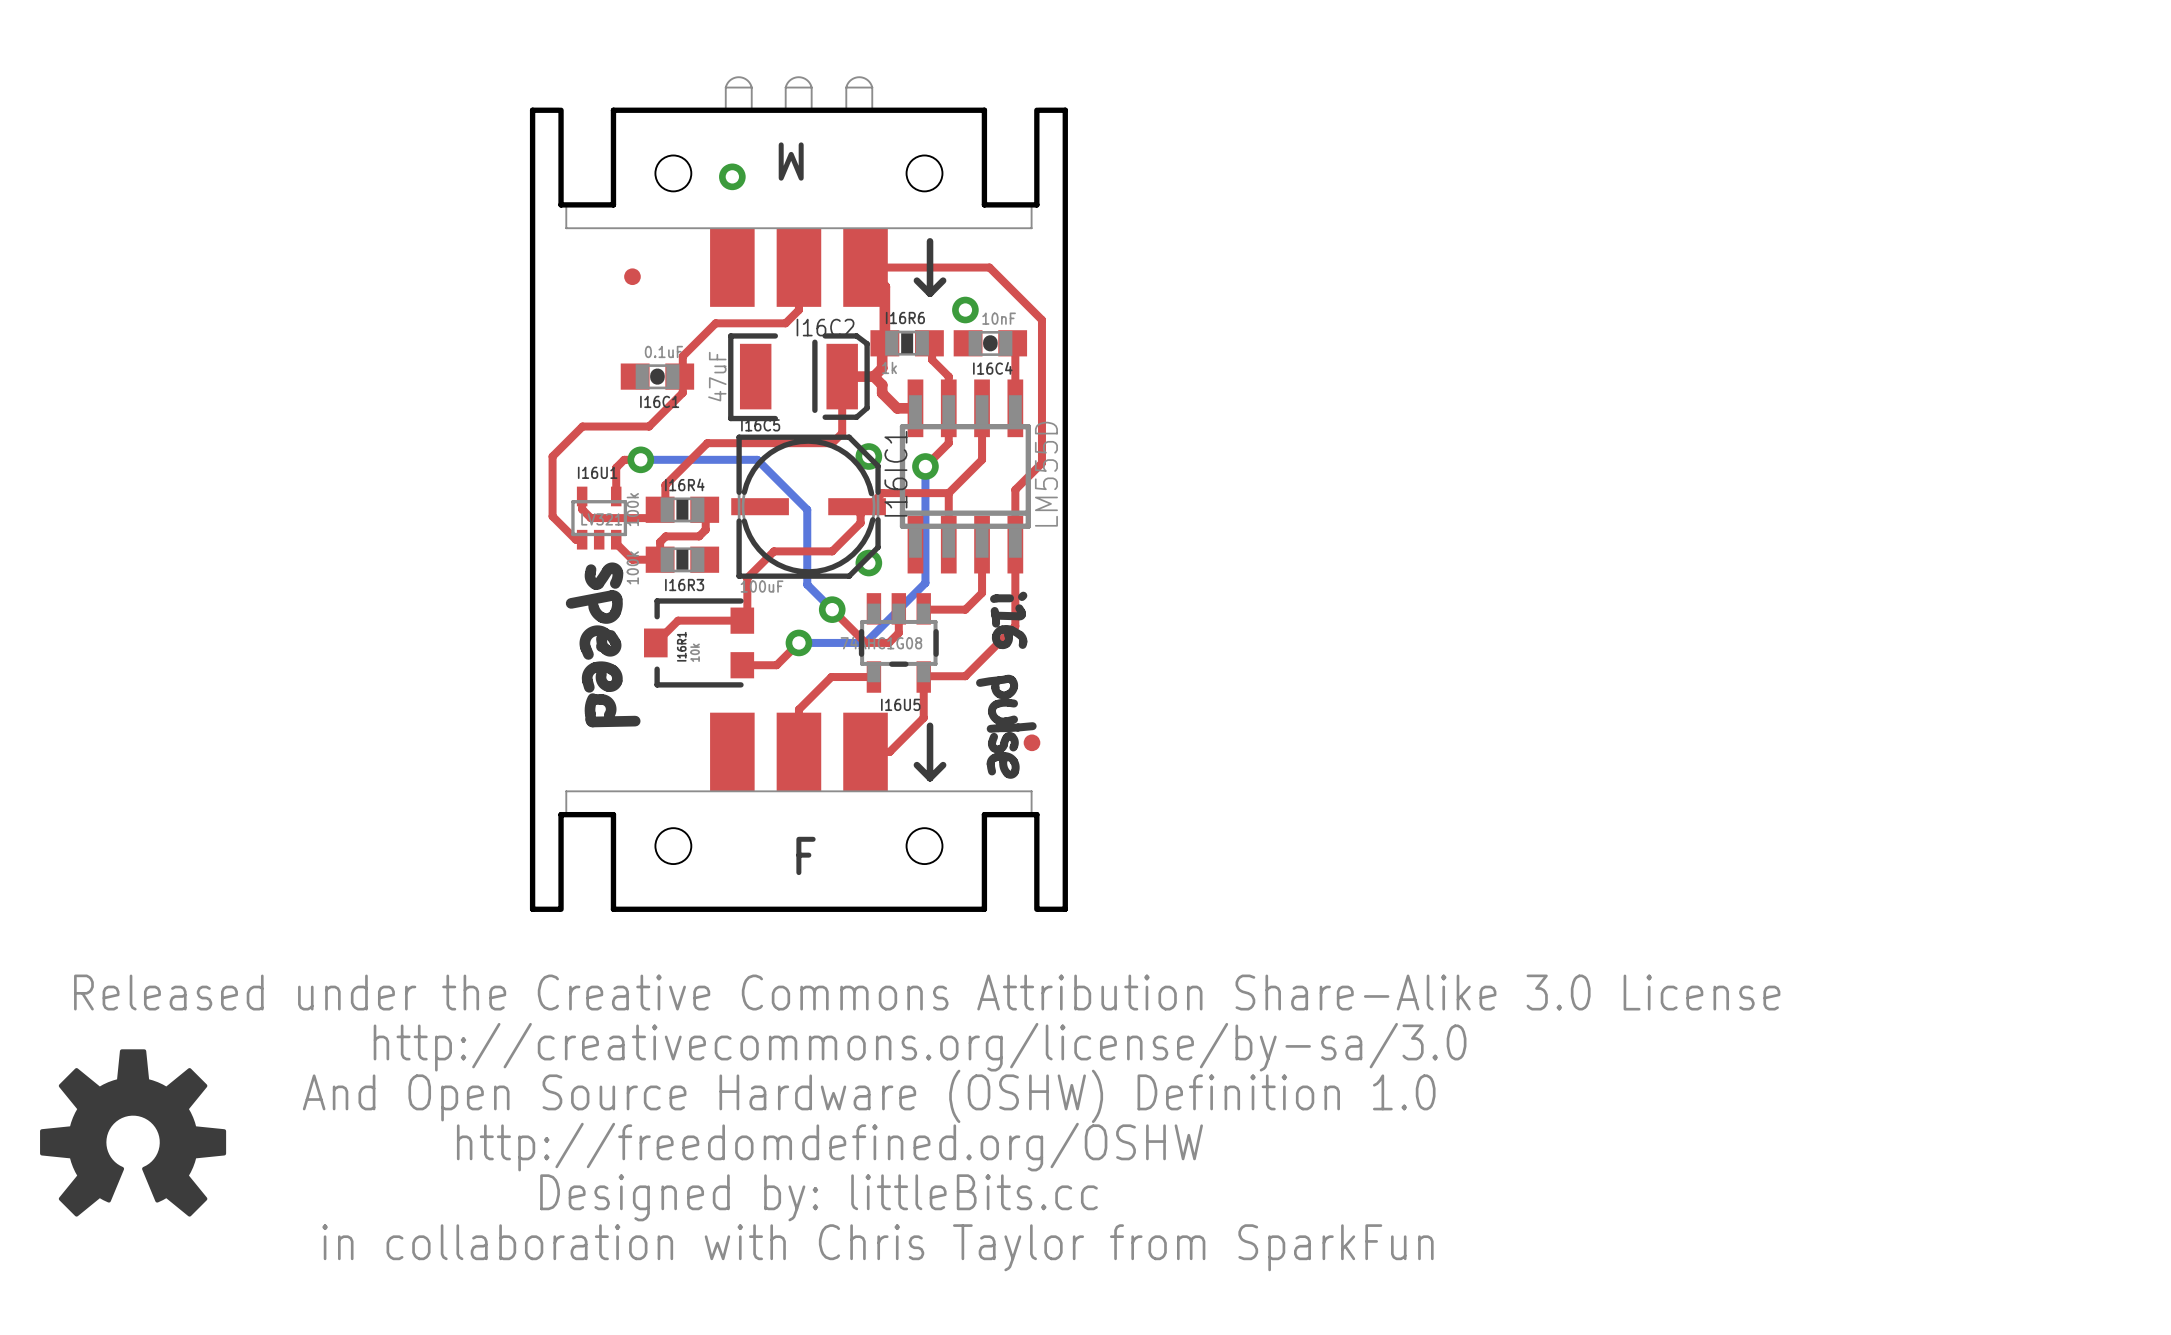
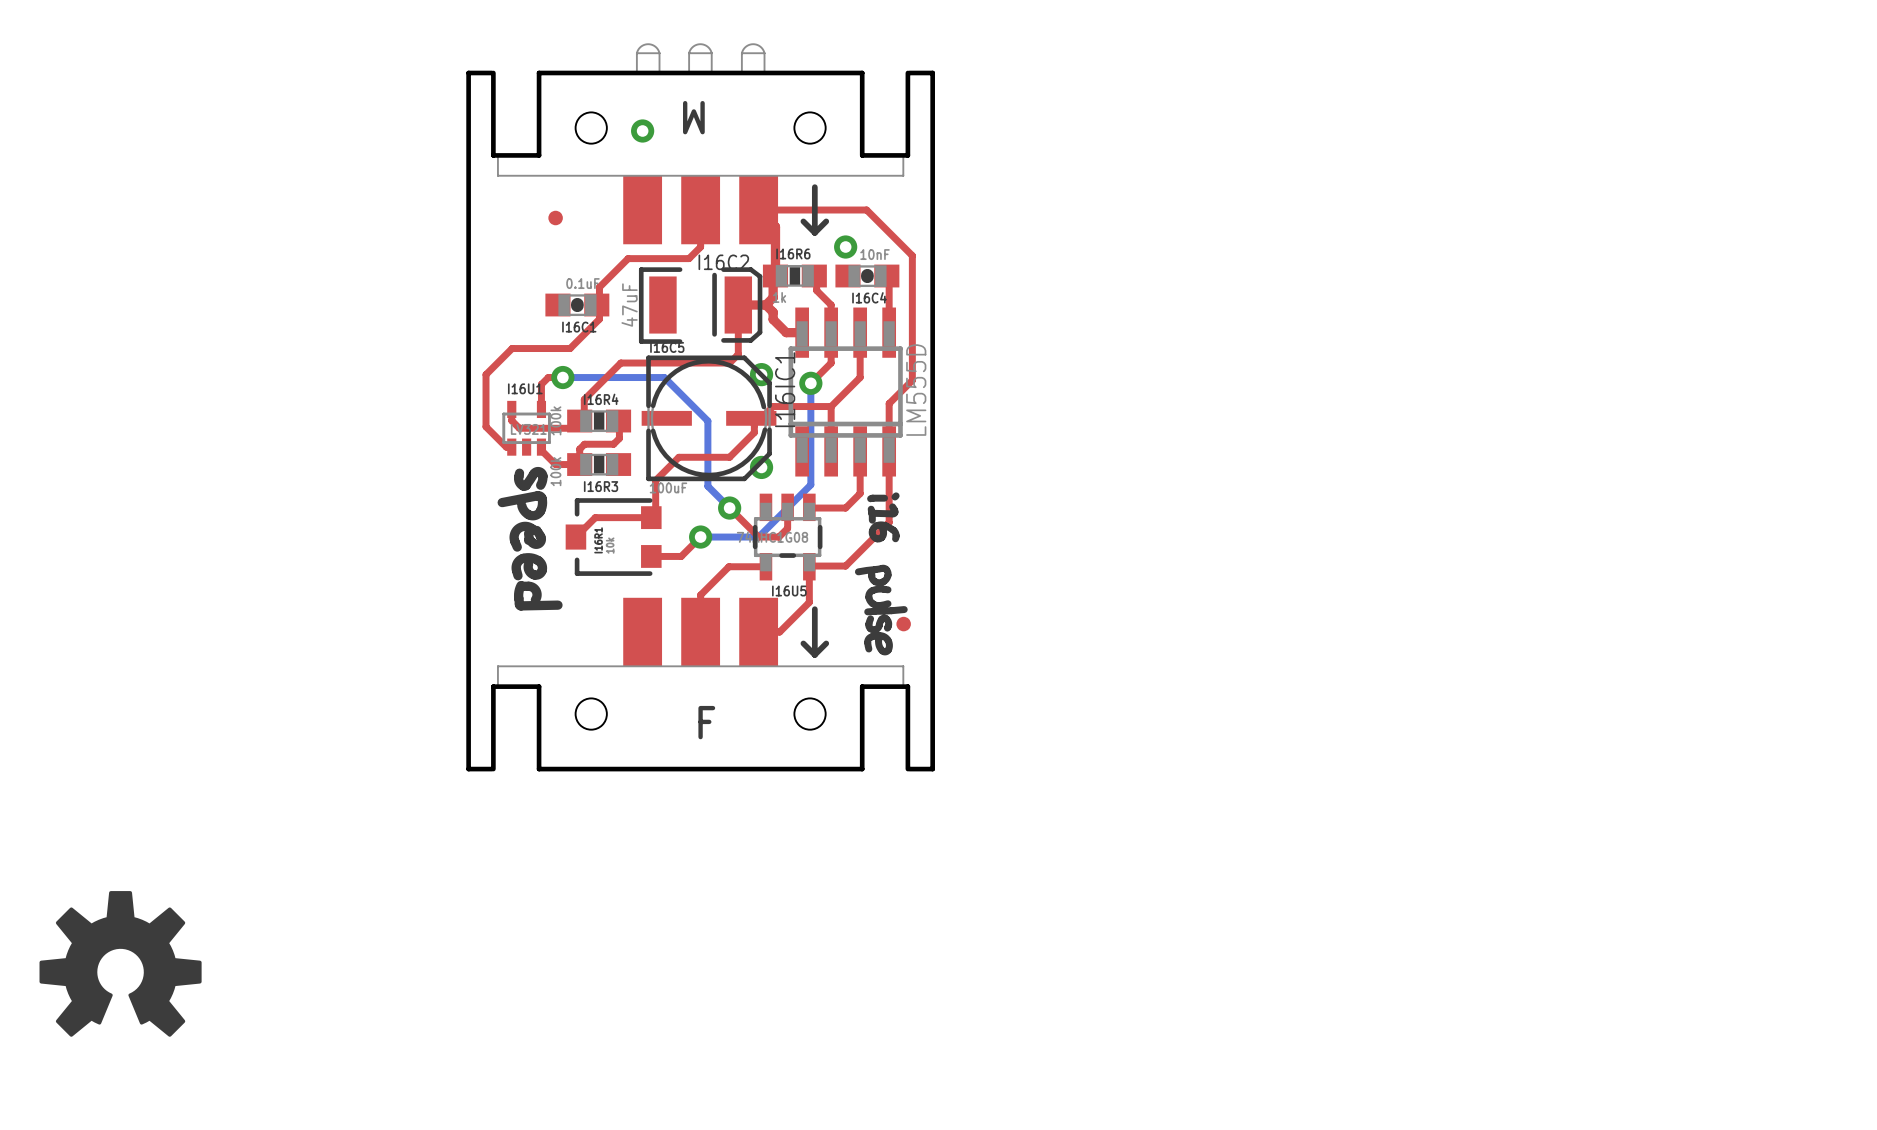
drawing: [74, 974, 1781, 1272] -> none

